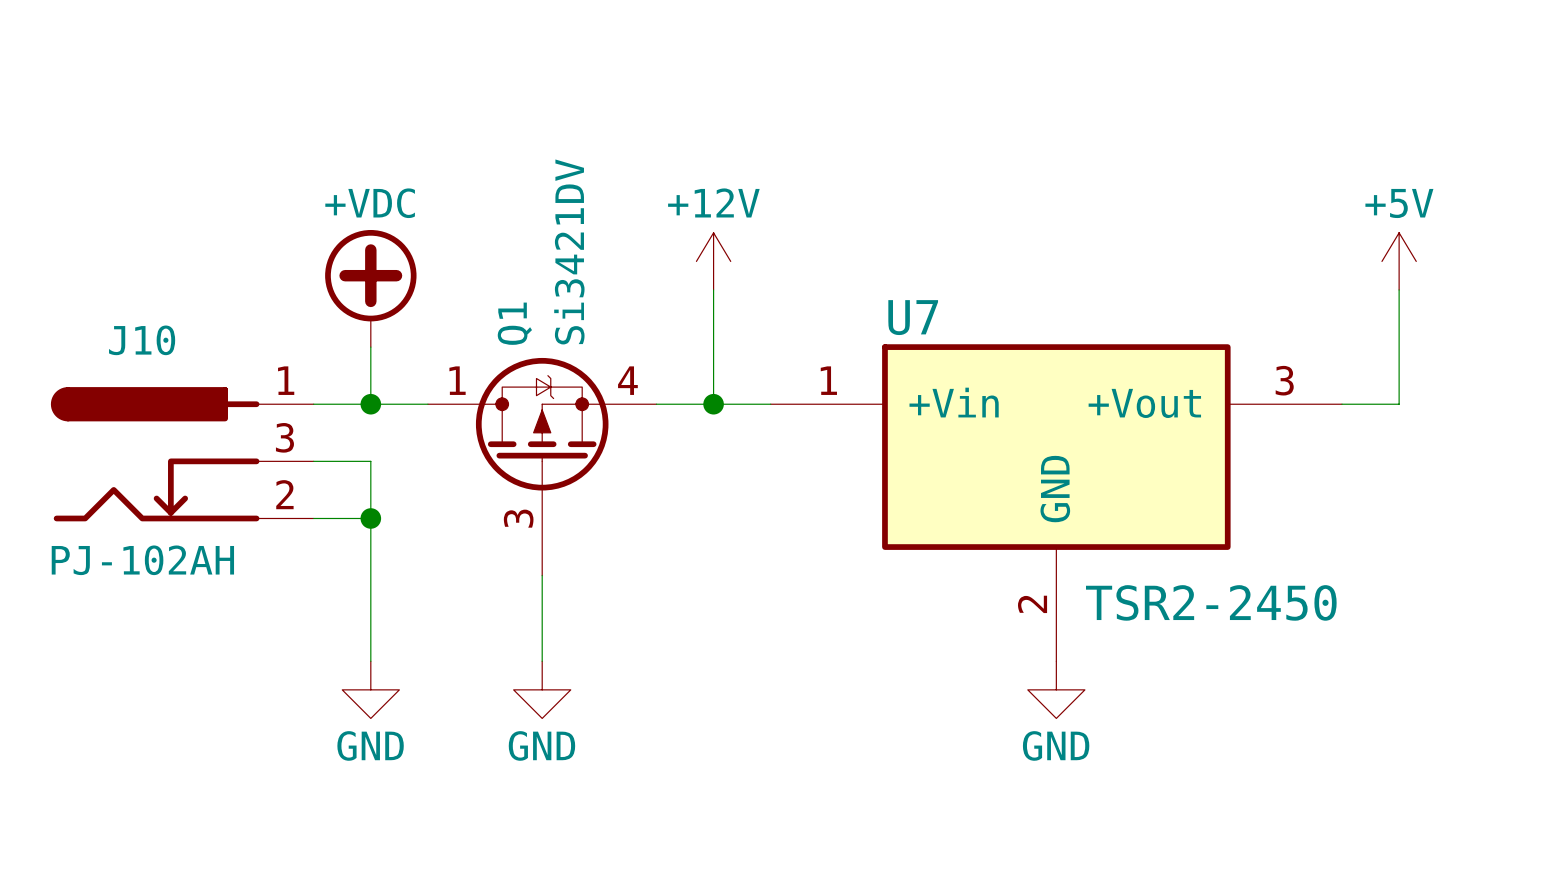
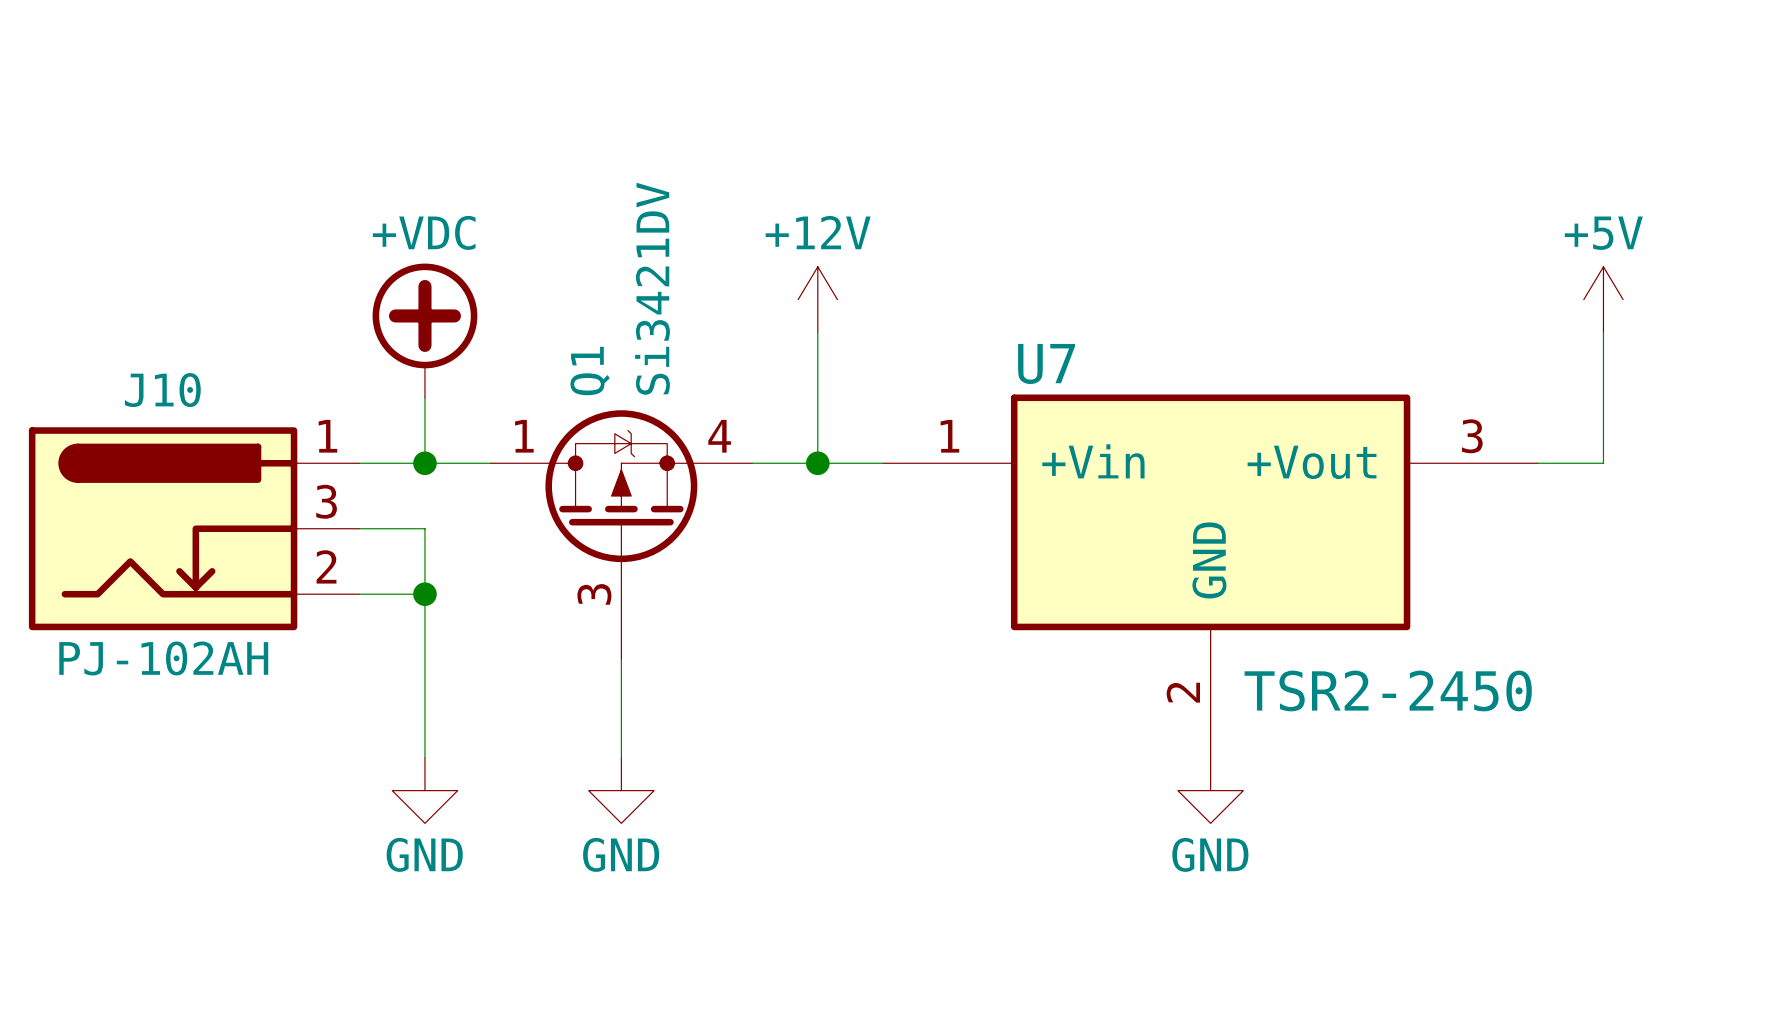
J10 symbol: [50, 387, 314, 522] -> [28, 427, 360, 631]

